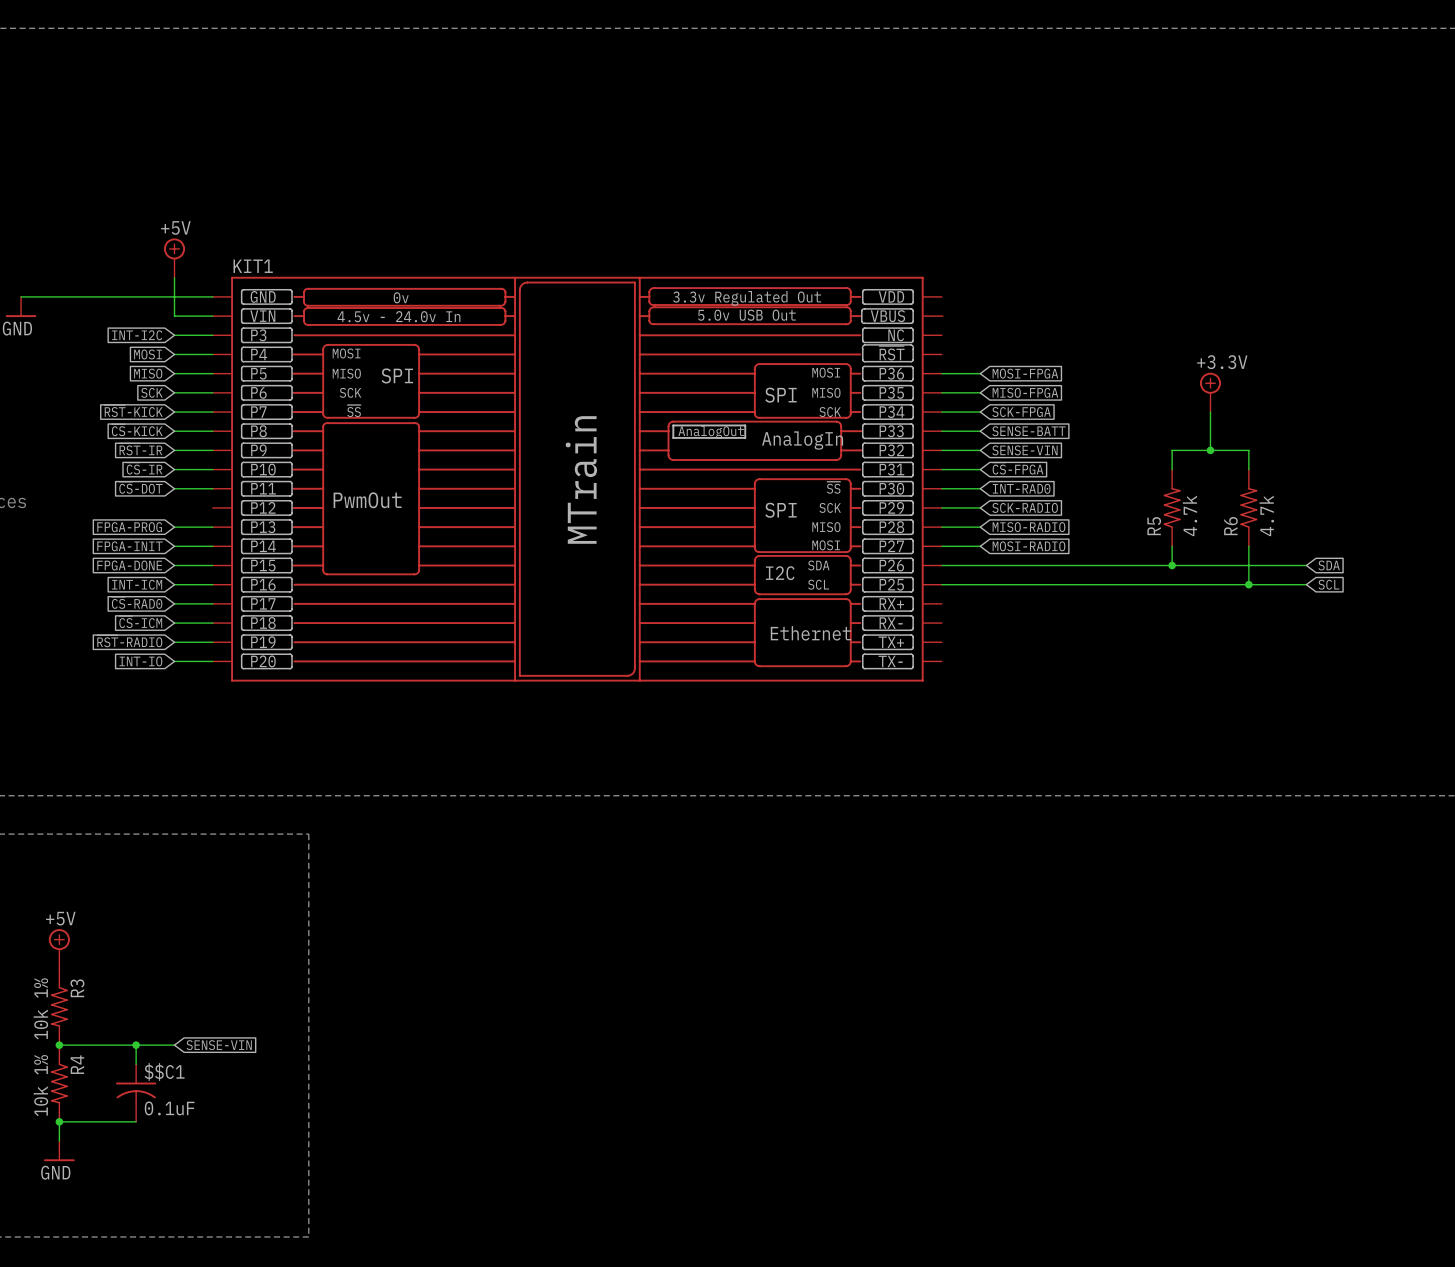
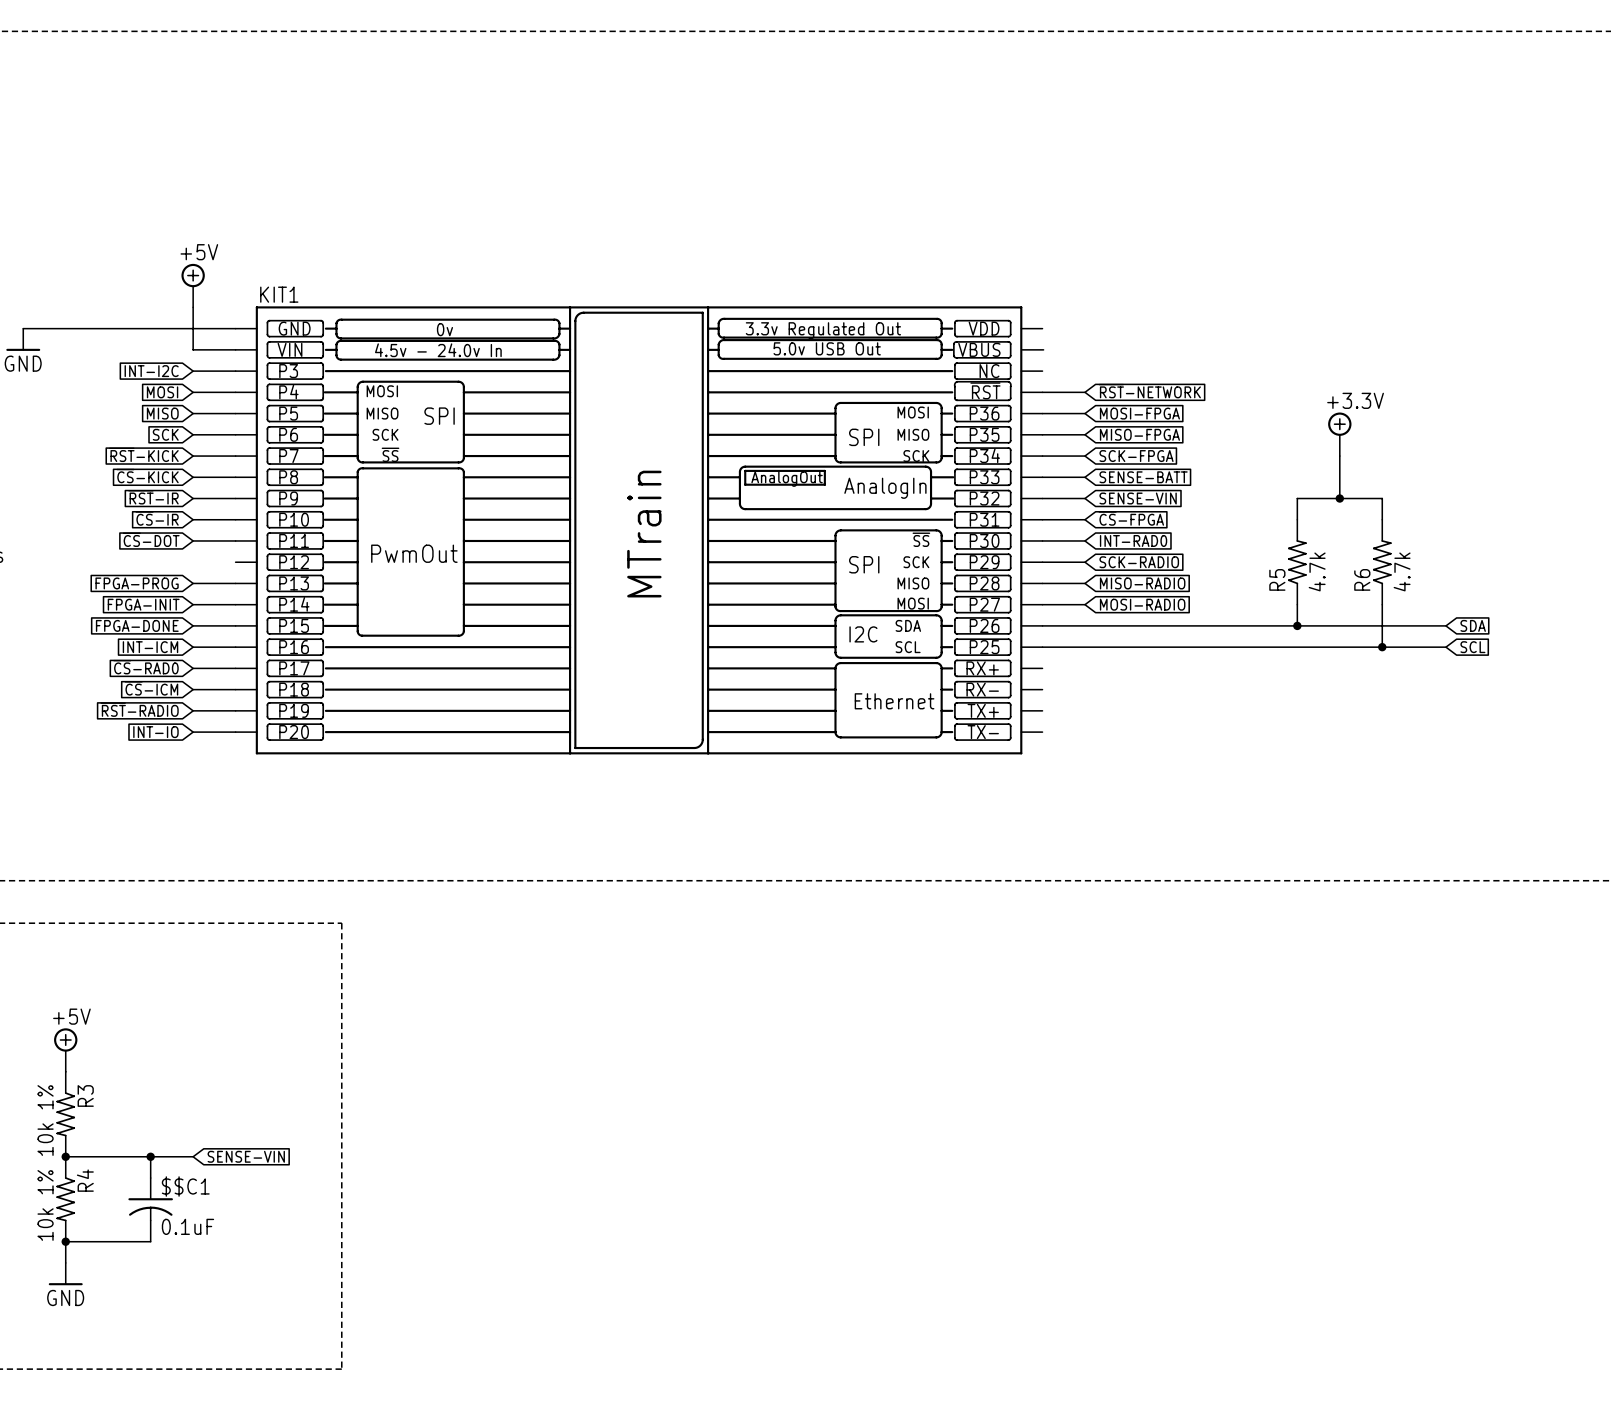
global label: none -> ~{RST}-NETWORK (1149, 391)
wire: none -> (1042, 392) (1084, 392)

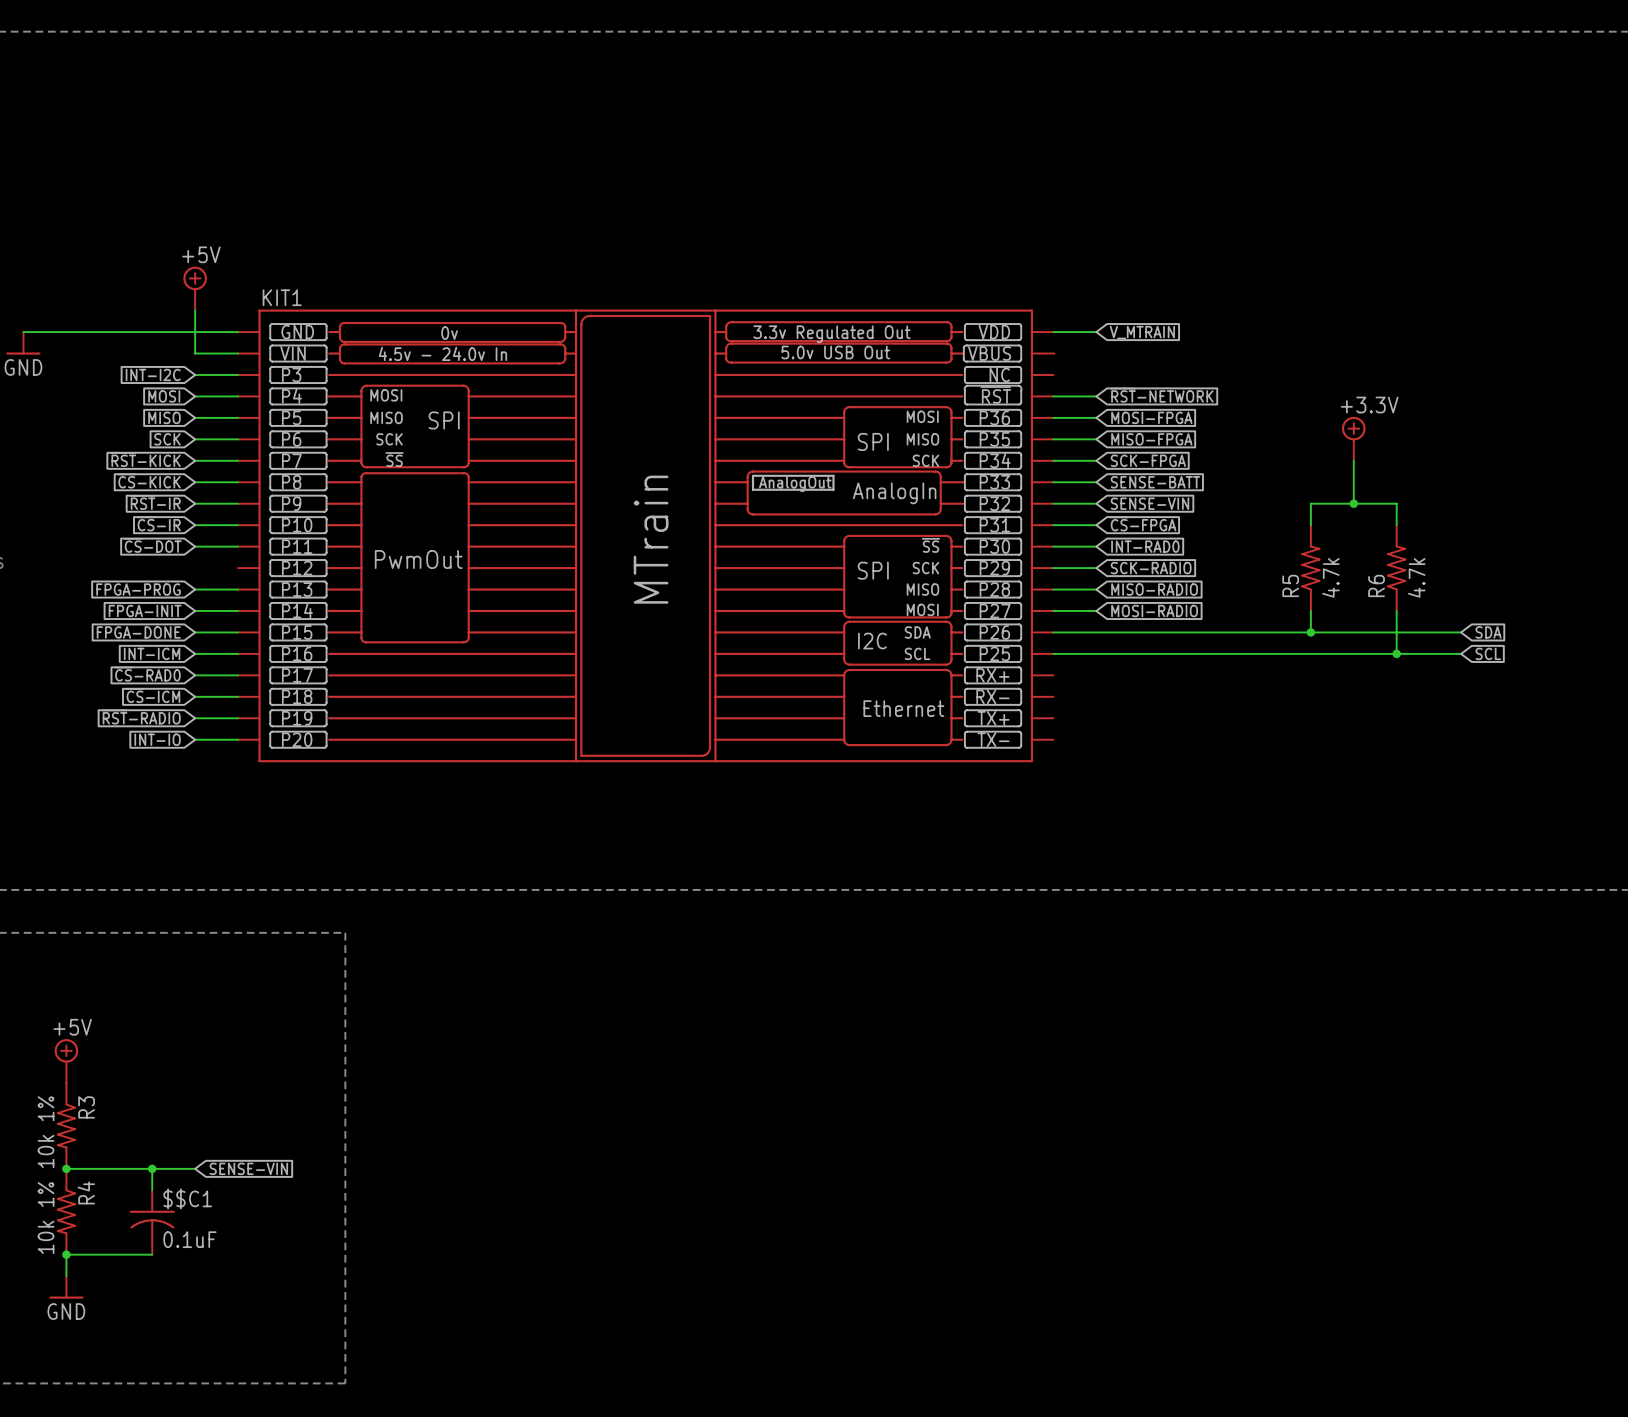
wire: none -> (1053, 332) (1096, 332)
global label: none -> V_MTRAIN (1142, 332)

